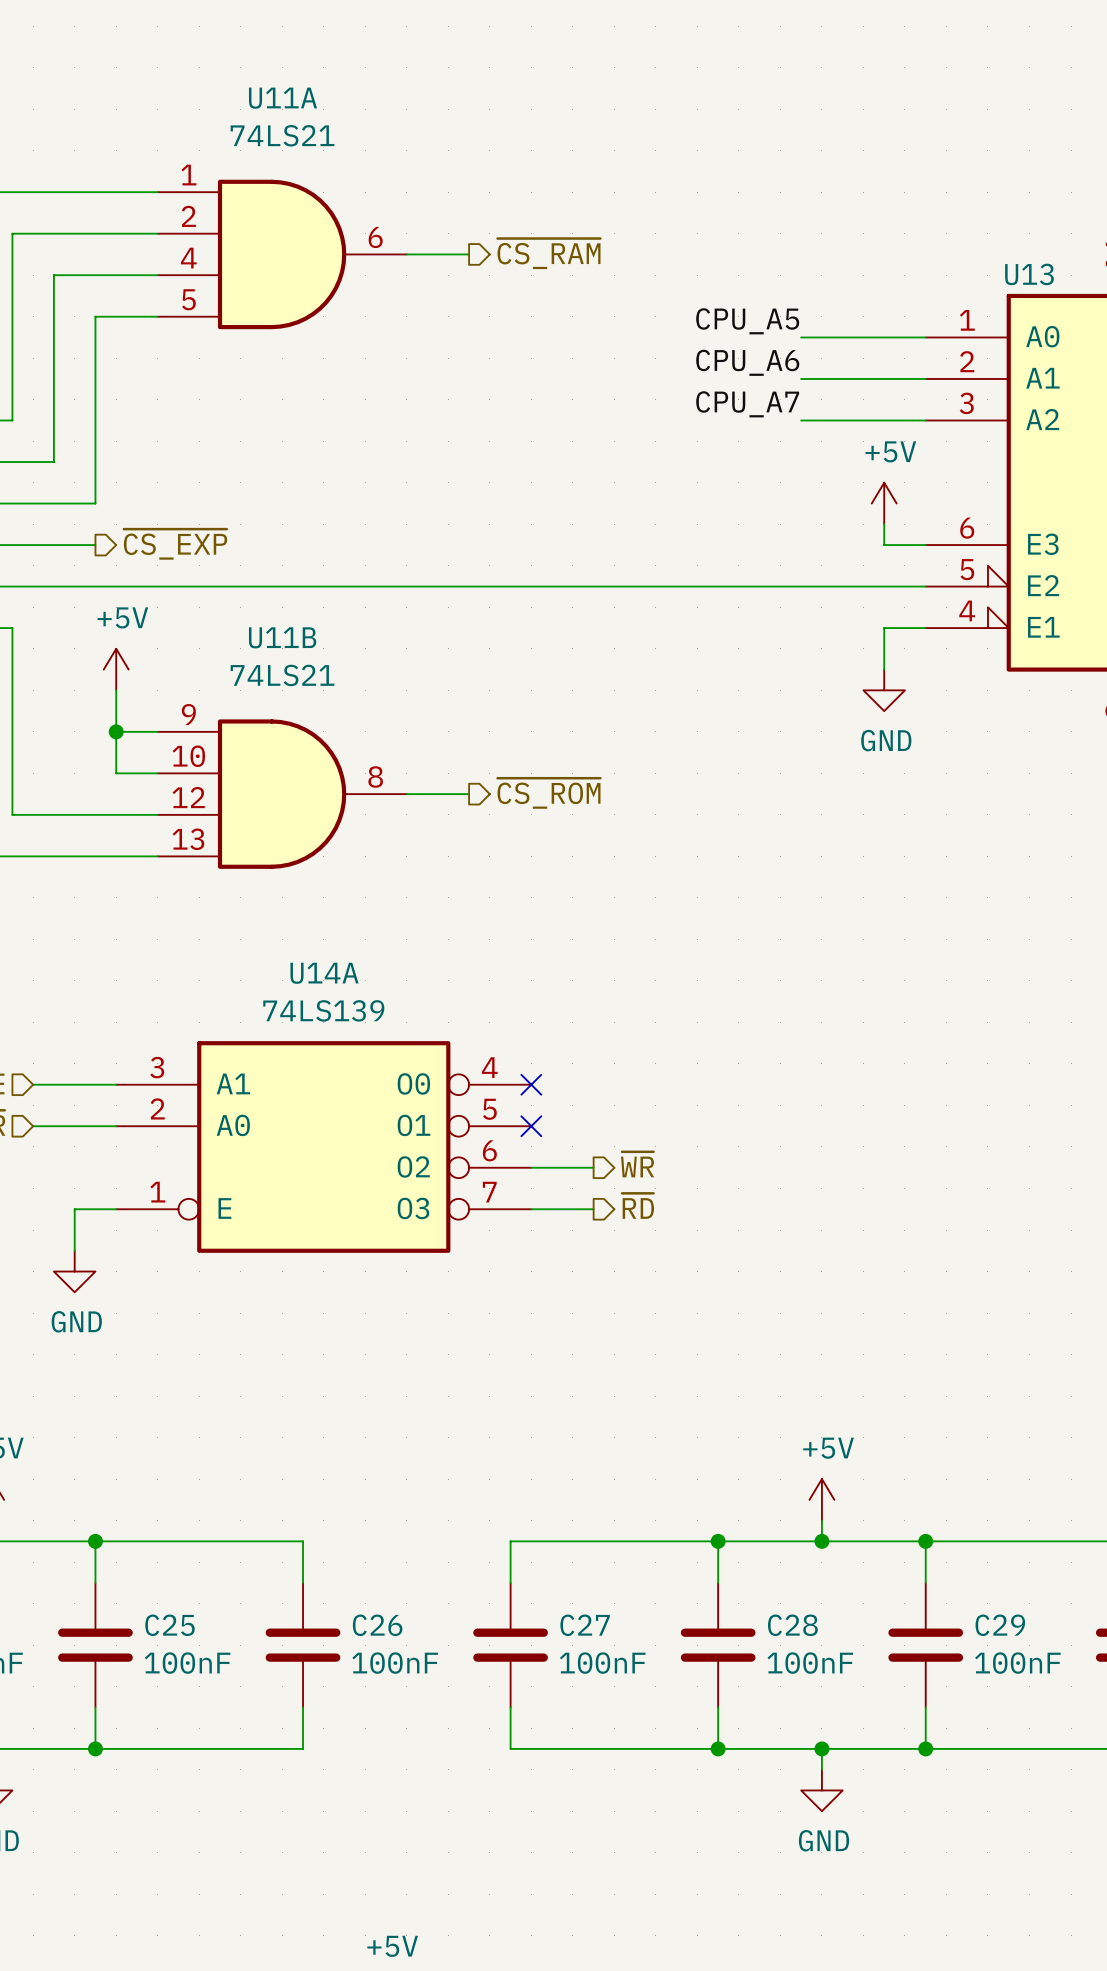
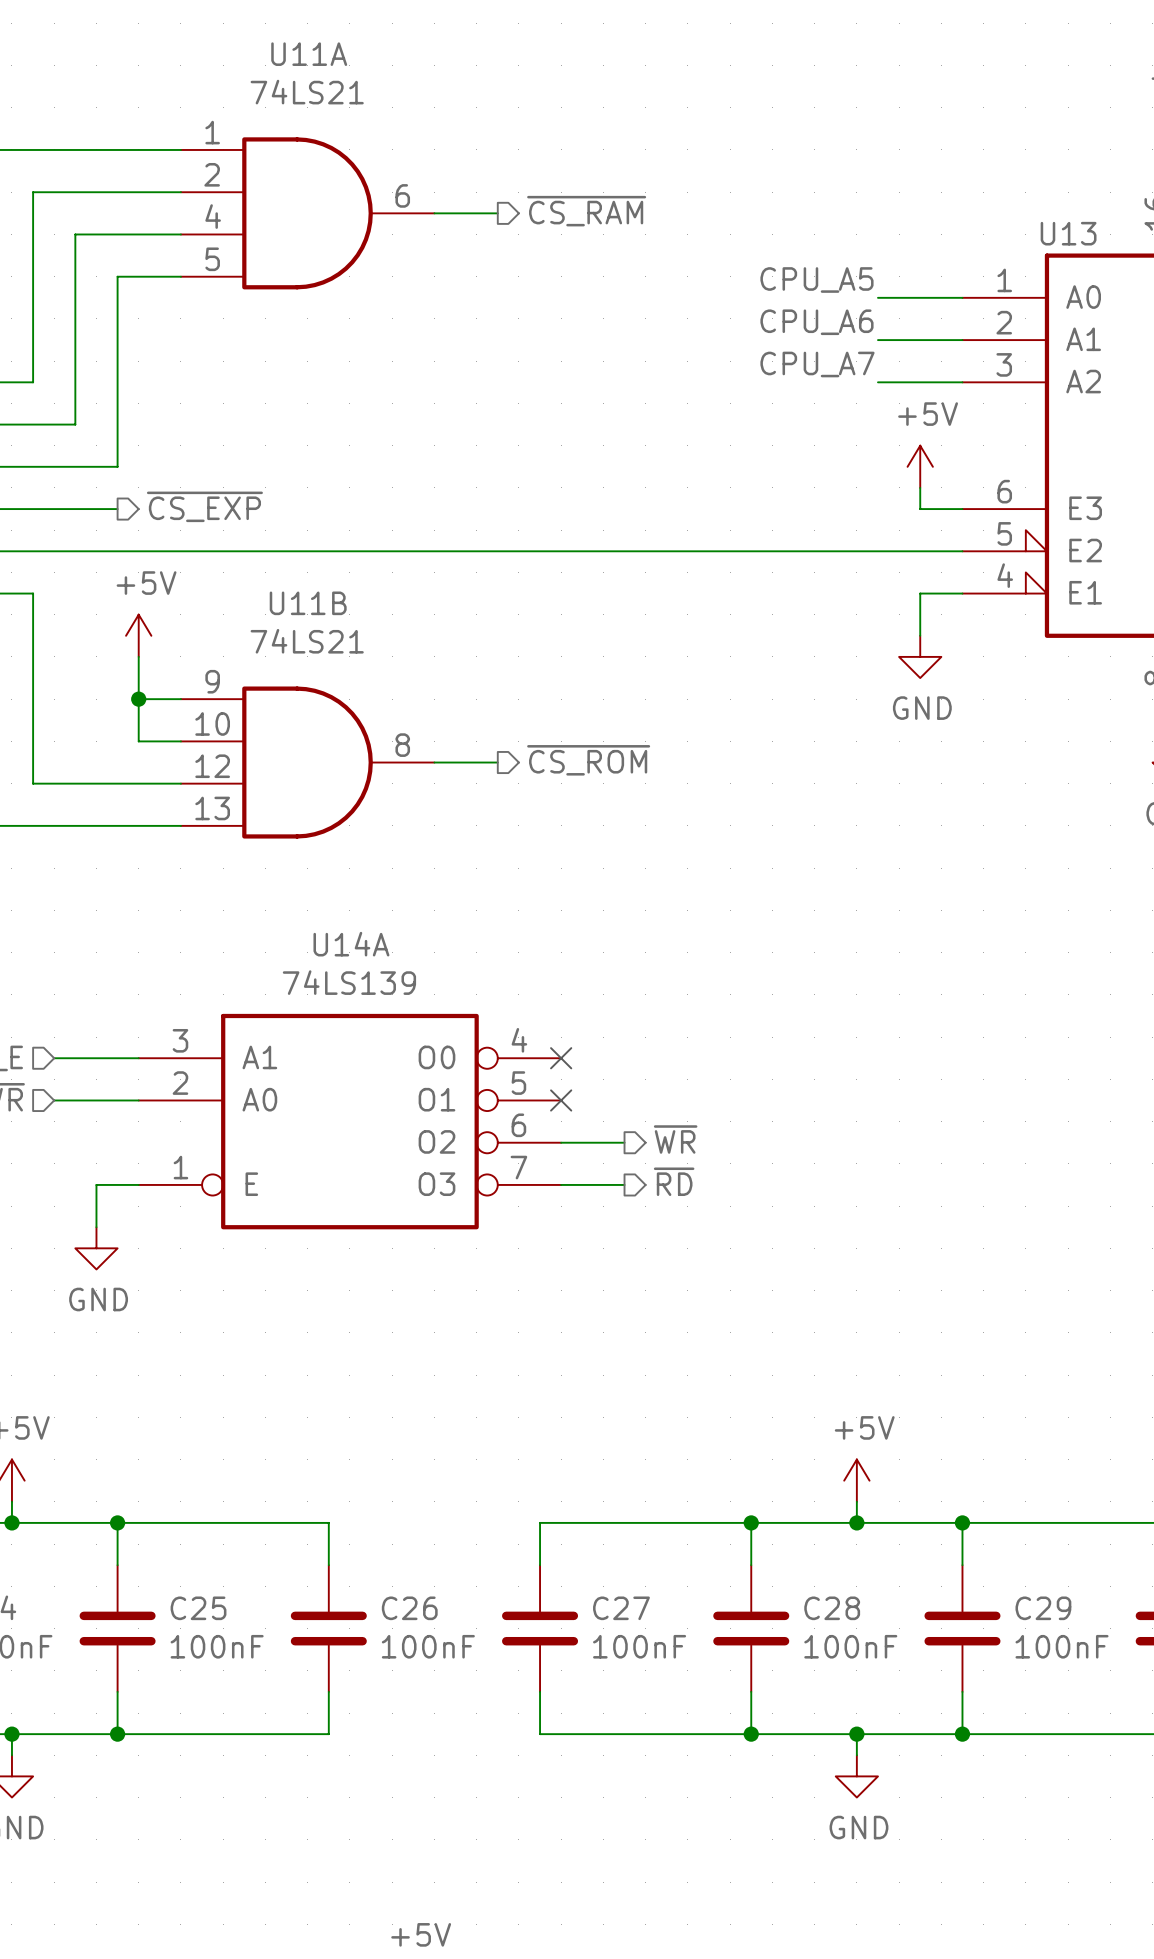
label position: CPU_A5 (747, 321) -> CPU_A5 (816, 279)
wire: (801, 337) (842, 337) -> none
label position: CPU_A6 (747, 362) -> CPU_A6 (816, 322)
wire: (801, 378) (842, 378) -> none
label position: CPU_A7 (747, 404) -> CPU_A7 (817, 364)
wire: (801, 420) (842, 420) -> none

